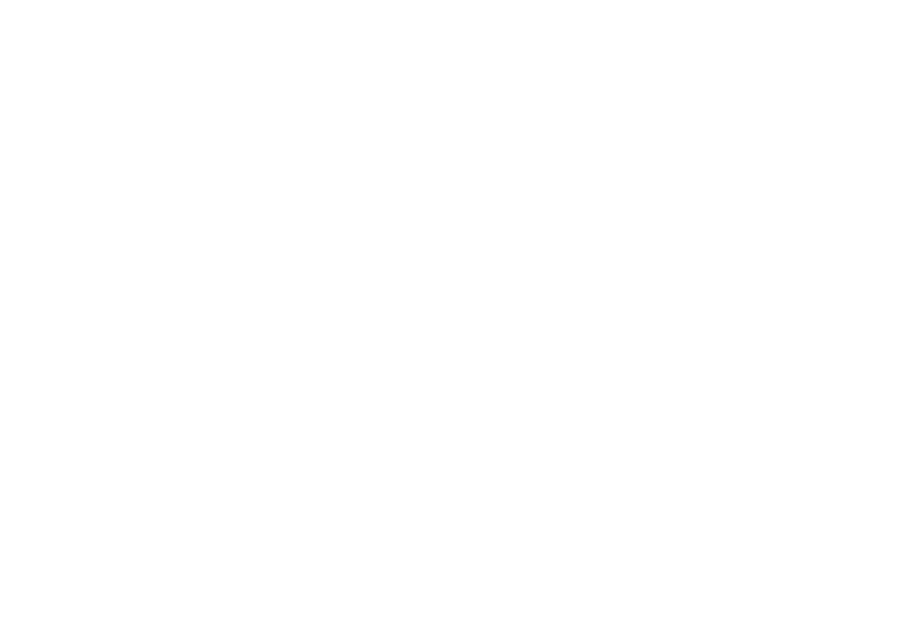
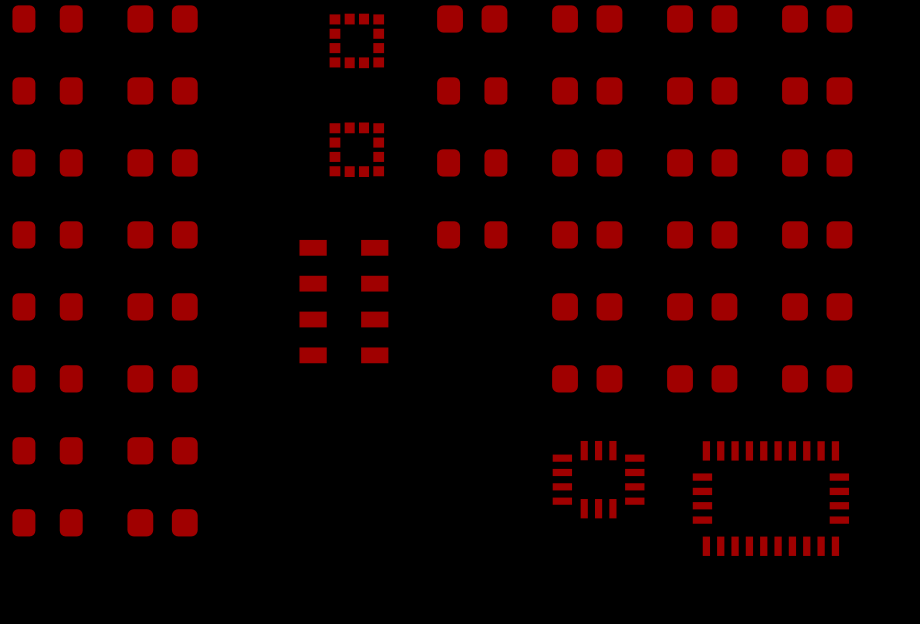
part: none -> (47, 18)
part: none -> (162, 18)
part: none -> (472, 18)
part: none -> (587, 18)
part: none -> (702, 18)
part: none -> (817, 18)
part: none -> (356, 40)
part: none -> (47, 90)
part: none -> (162, 90)
part: none -> (472, 90)
part: none -> (587, 90)
part: none -> (702, 90)
part: none -> (817, 90)
part: none -> (356, 149)
part: none -> (47, 162)
part: none -> (162, 162)
part: none -> (472, 162)
part: none -> (587, 162)
part: none -> (702, 162)
part: none -> (817, 162)
part: none -> (47, 234)
part: none -> (162, 234)
part: none -> (472, 234)
part: none -> (587, 234)
part: none -> (702, 234)
part: none -> (817, 234)
part: none -> (343, 301)
part: none -> (47, 306)
part: none -> (162, 306)
part: none -> (587, 306)
part: none -> (702, 306)
part: none -> (817, 306)
part: none -> (47, 378)
part: none -> (162, 378)
part: none -> (587, 378)
part: none -> (702, 378)
part: none -> (817, 378)
part: none -> (47, 450)
part: none -> (162, 450)
part: none -> (598, 479)
part: none -> (770, 498)
part: none -> (47, 522)
part: none -> (162, 522)

